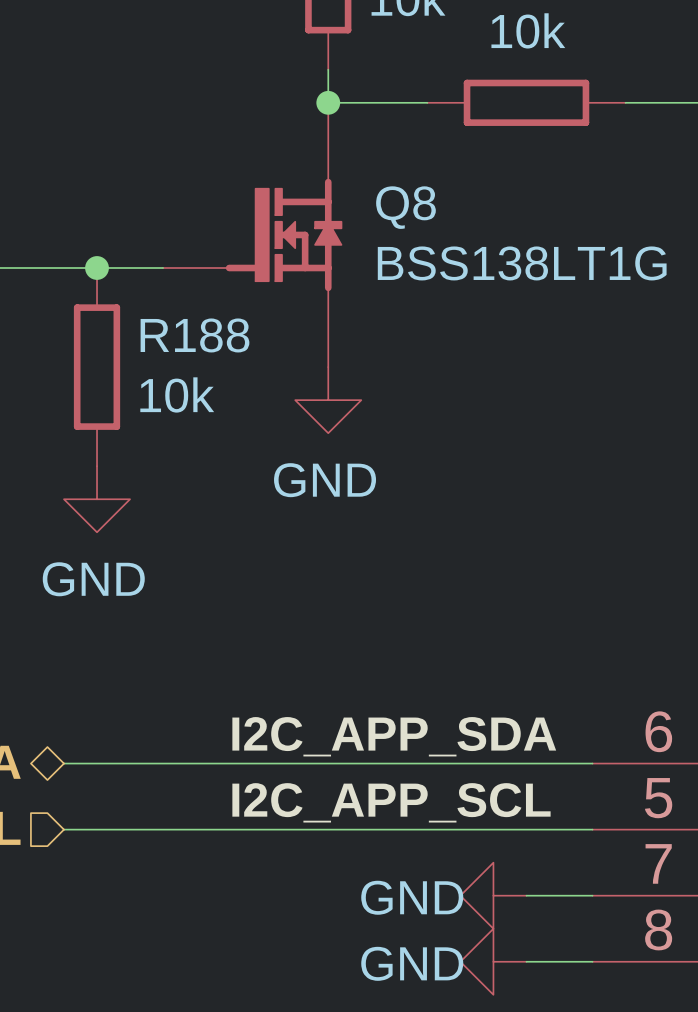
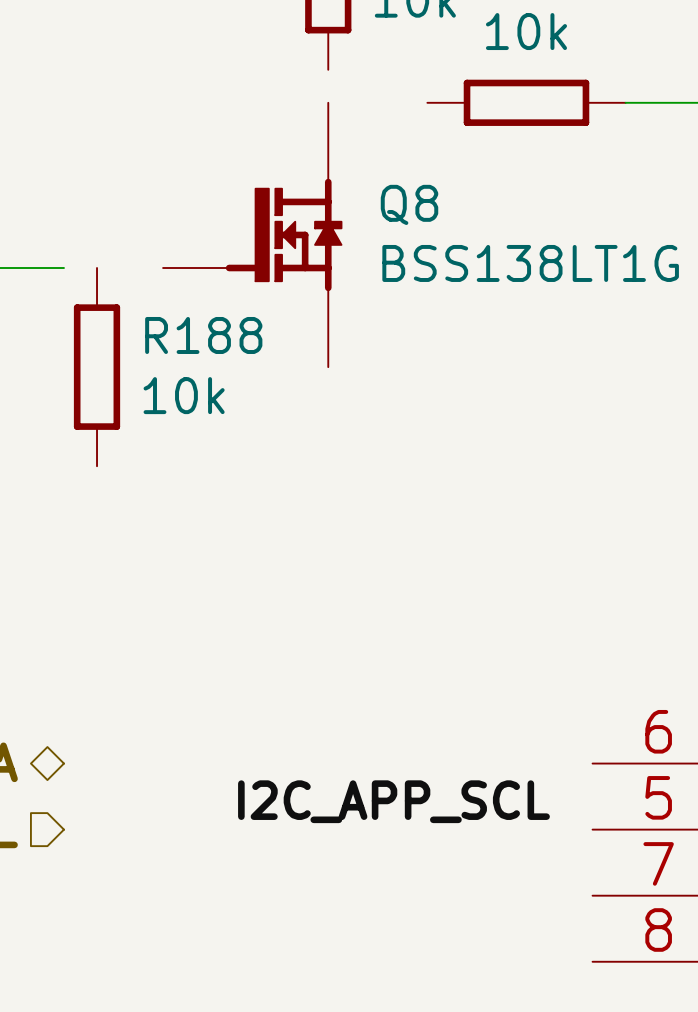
wire: (328, 69) (328, 102) (427, 102) -> none
junction: (328, 102) -> none
wire: (63, 268) (163, 268) -> none
junction: (97, 268) -> none
power symbol: GND (328, 400) -> none
power symbol: GND (97, 499) -> none
label: I2C_APP_SDA (394, 736) -> none
wire: (63, 763) (592, 763) -> none
wire: (63, 829) (592, 829) -> none
power symbol: GND (493, 895) -> none
wire: (526, 895) (592, 895) -> none
power symbol: GND (493, 961) -> none
wire: (526, 961) (592, 961) -> none

